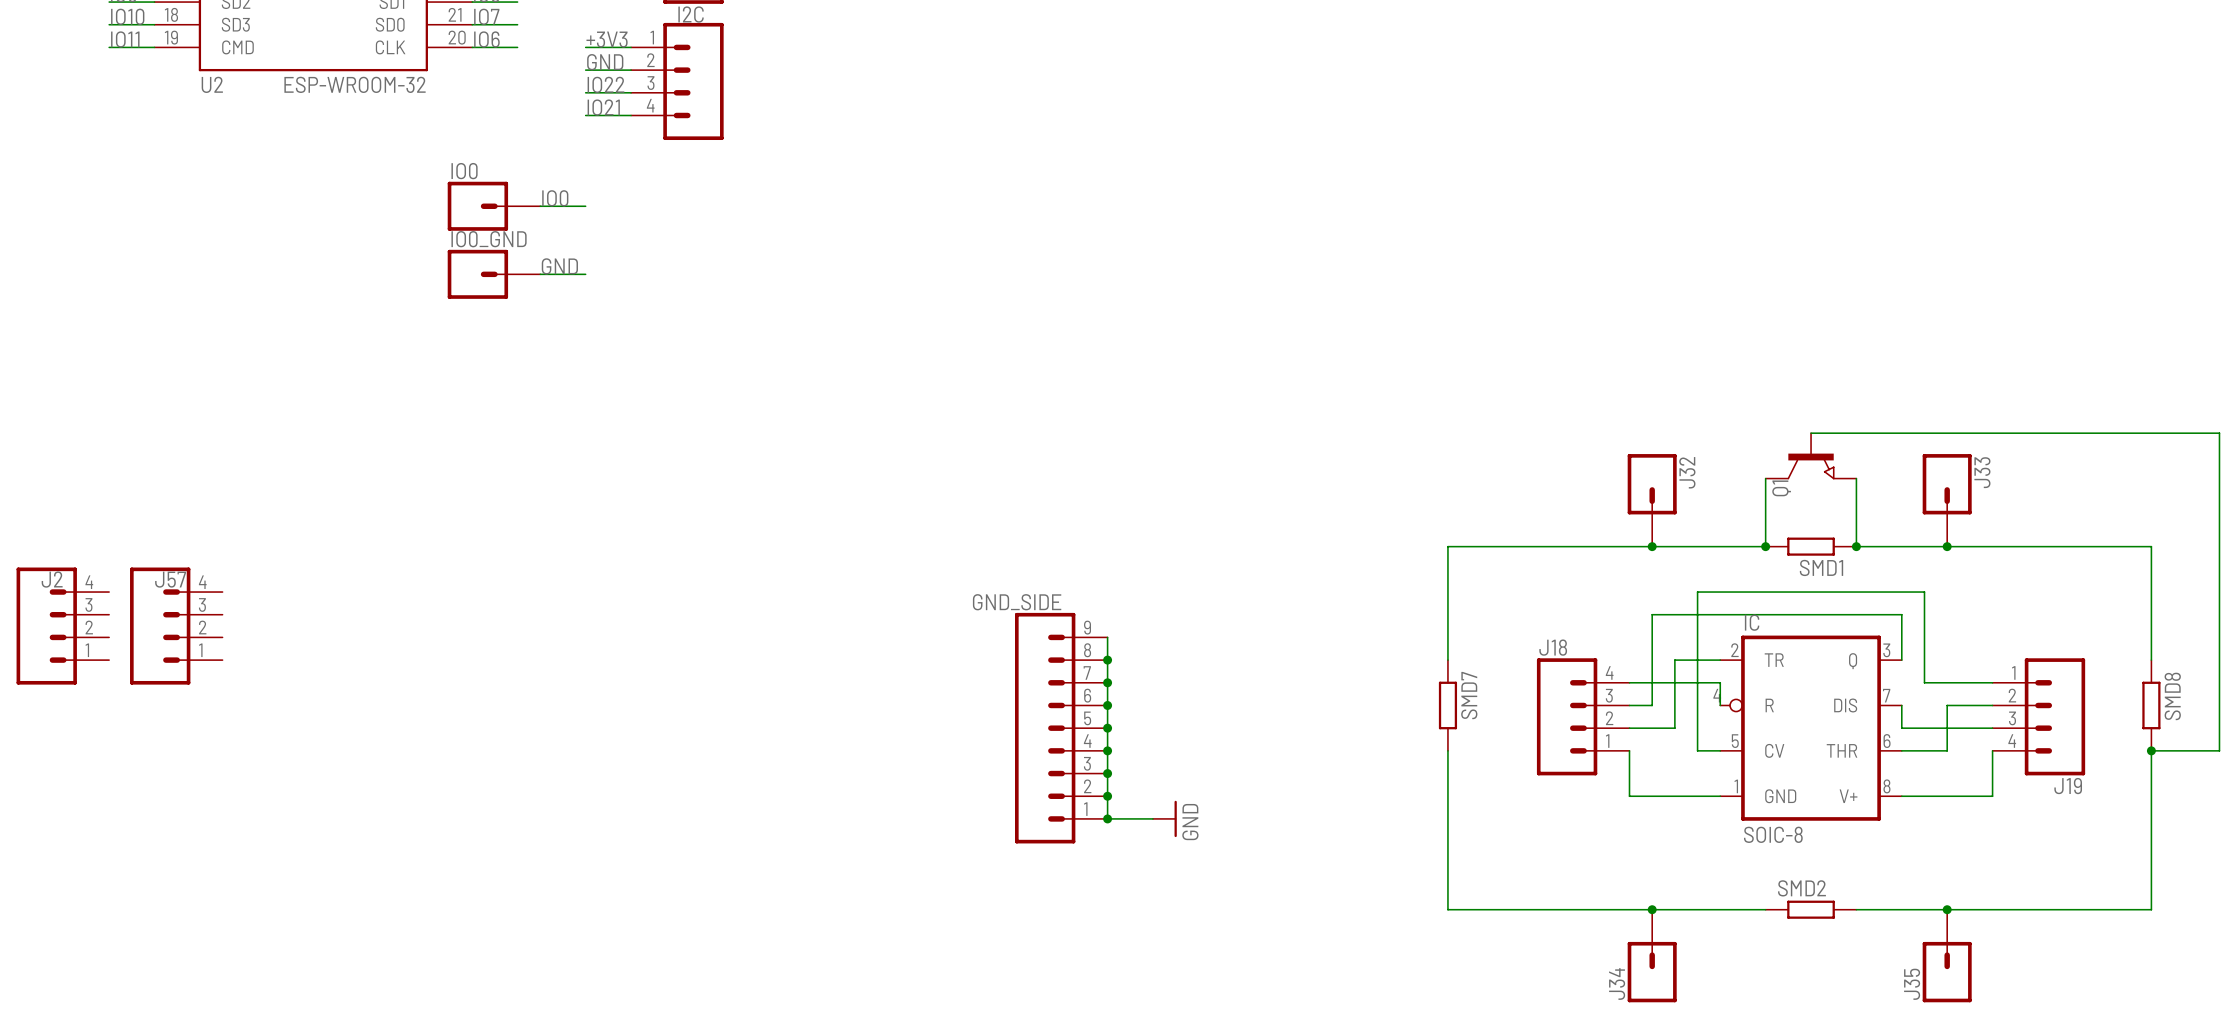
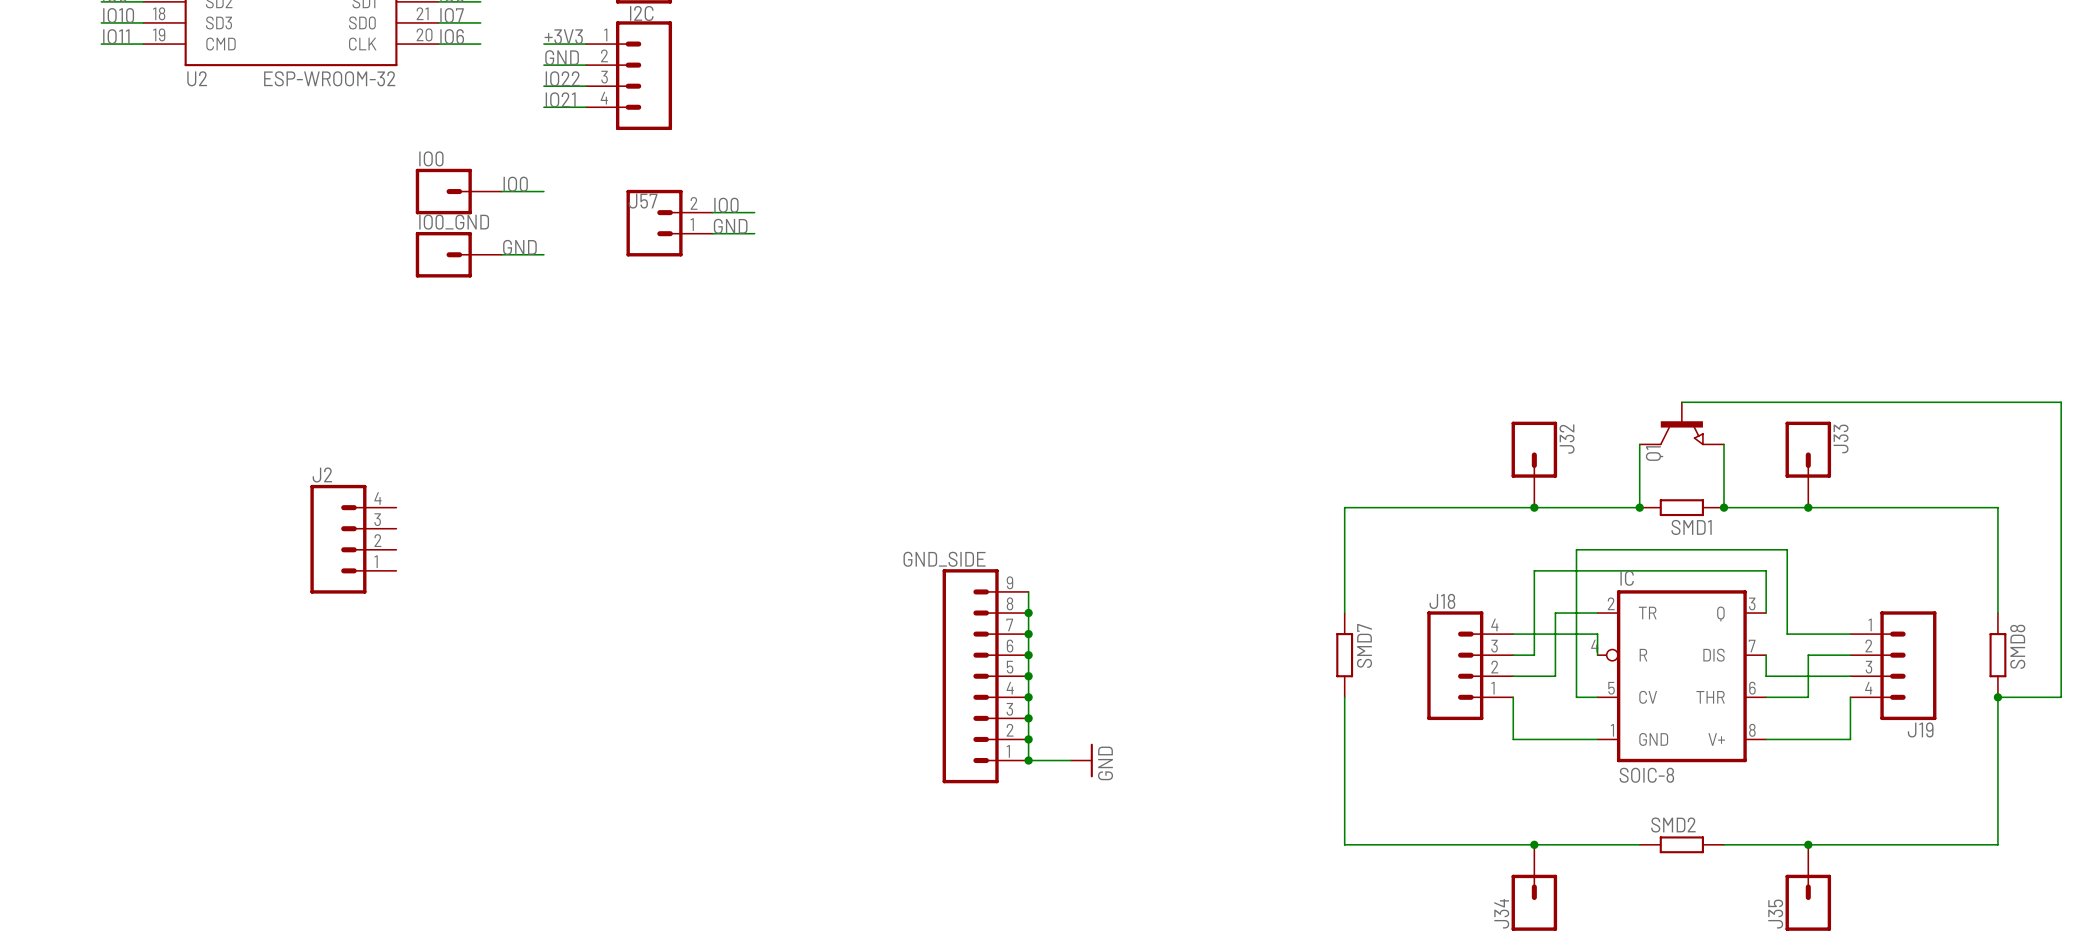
label: none -> IO0 (726, 205)
wire: none -> (712, 212) (754, 212)
label: none -> GND (730, 226)
wire: none -> (712, 233) (754, 233)
J57 symbol: [130, 567, 223, 685] -> [626, 189, 713, 257]
J2 name position: J2 (52, 579) -> J2 (322, 474)
J57 name position: J57 (170, 579) -> J57 (643, 201)
J2 position: (62, 626) -> (353, 539)

